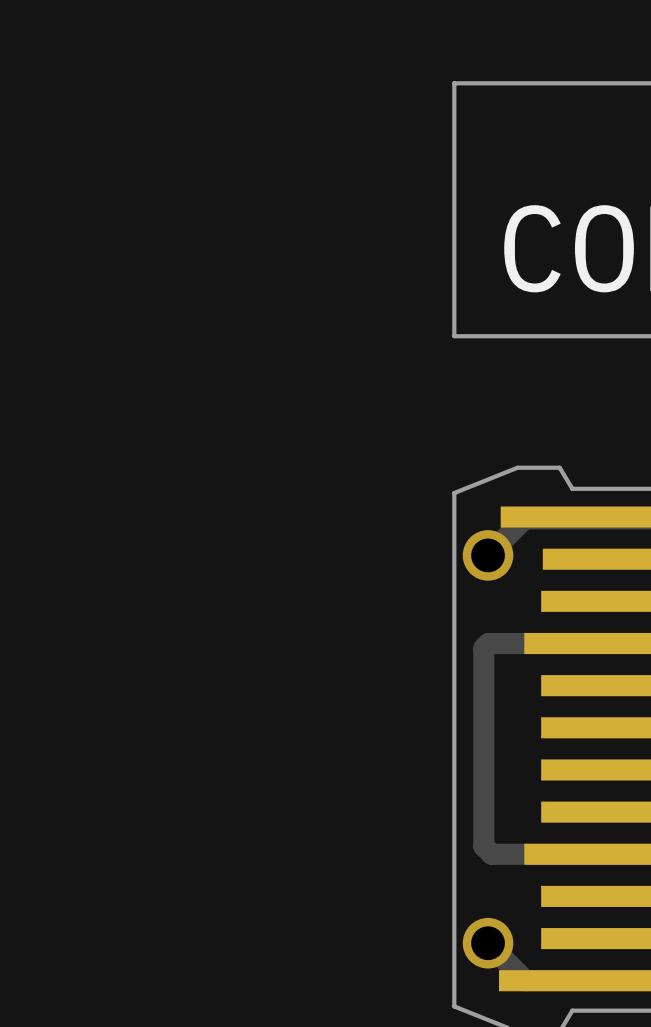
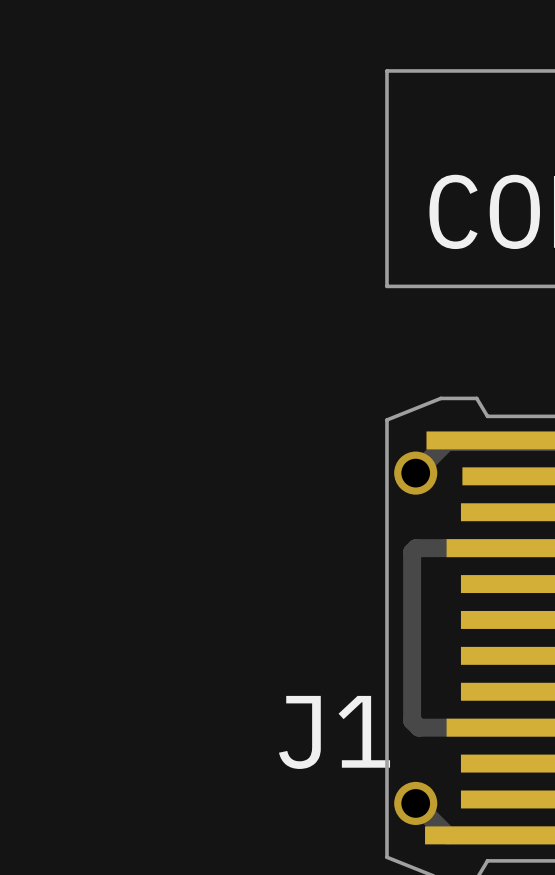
J1 name: none -> J1 (334, 732)

